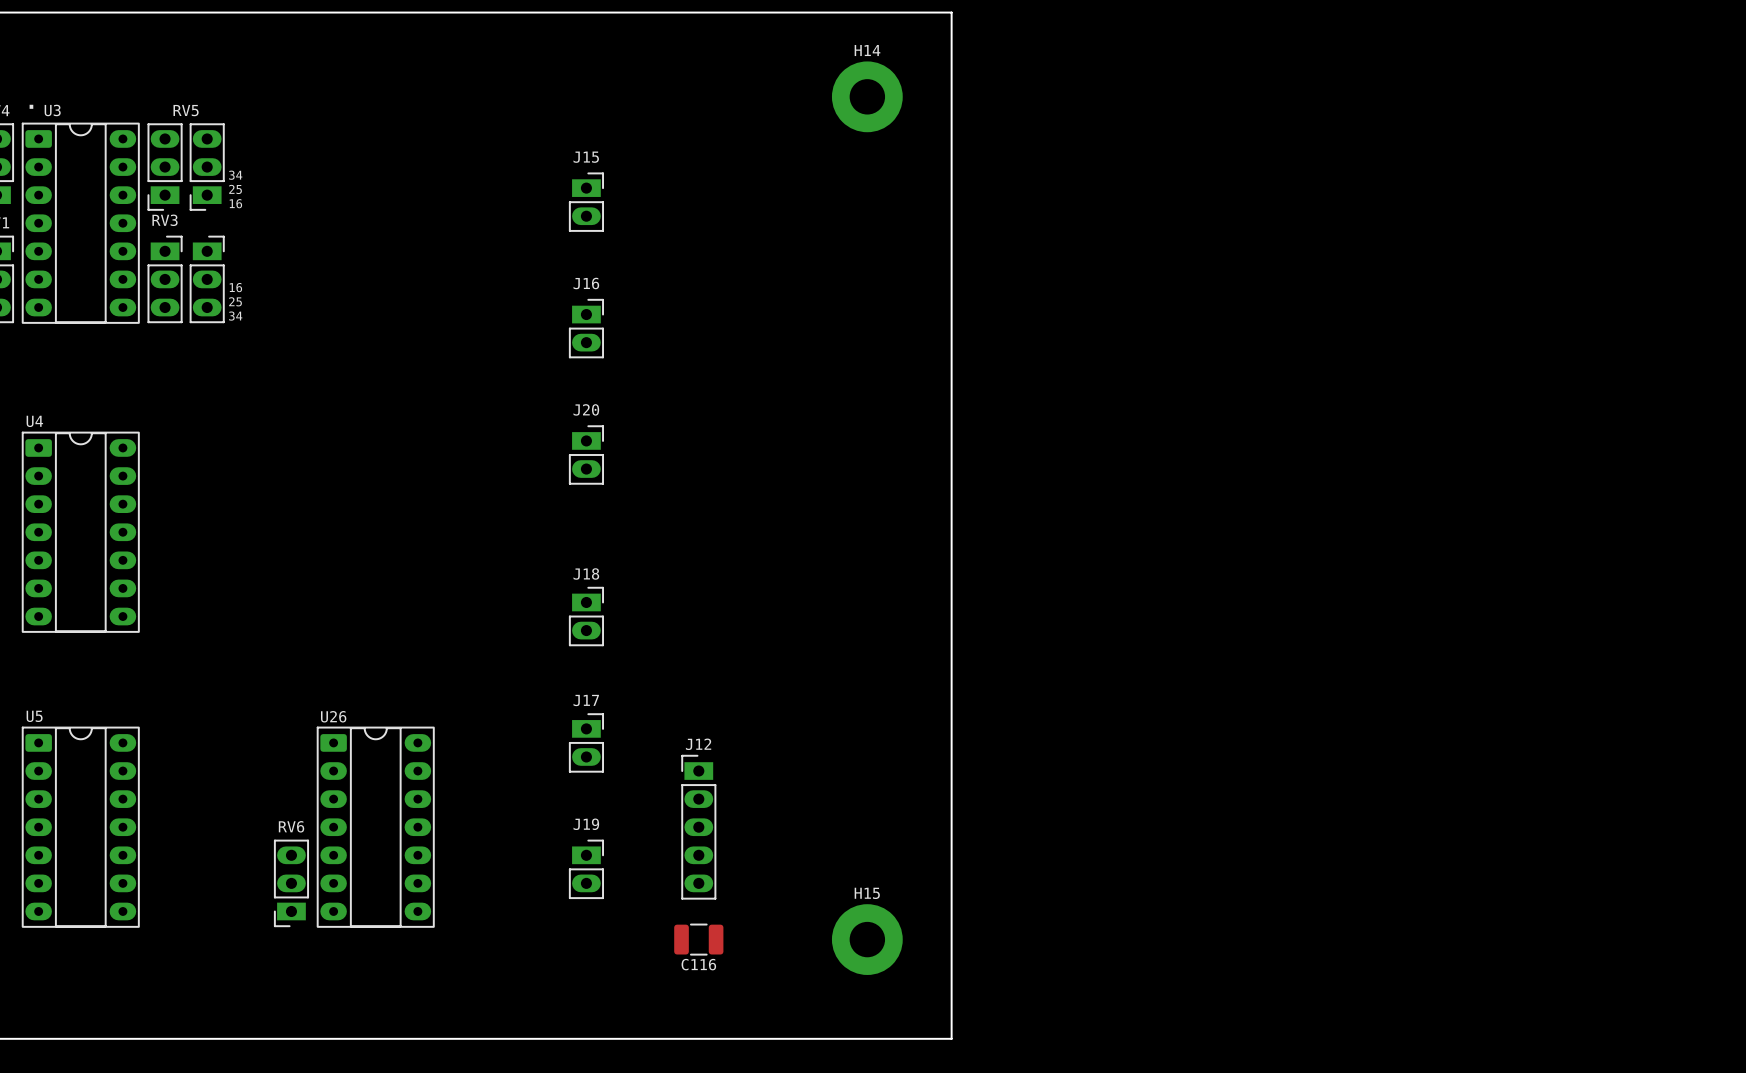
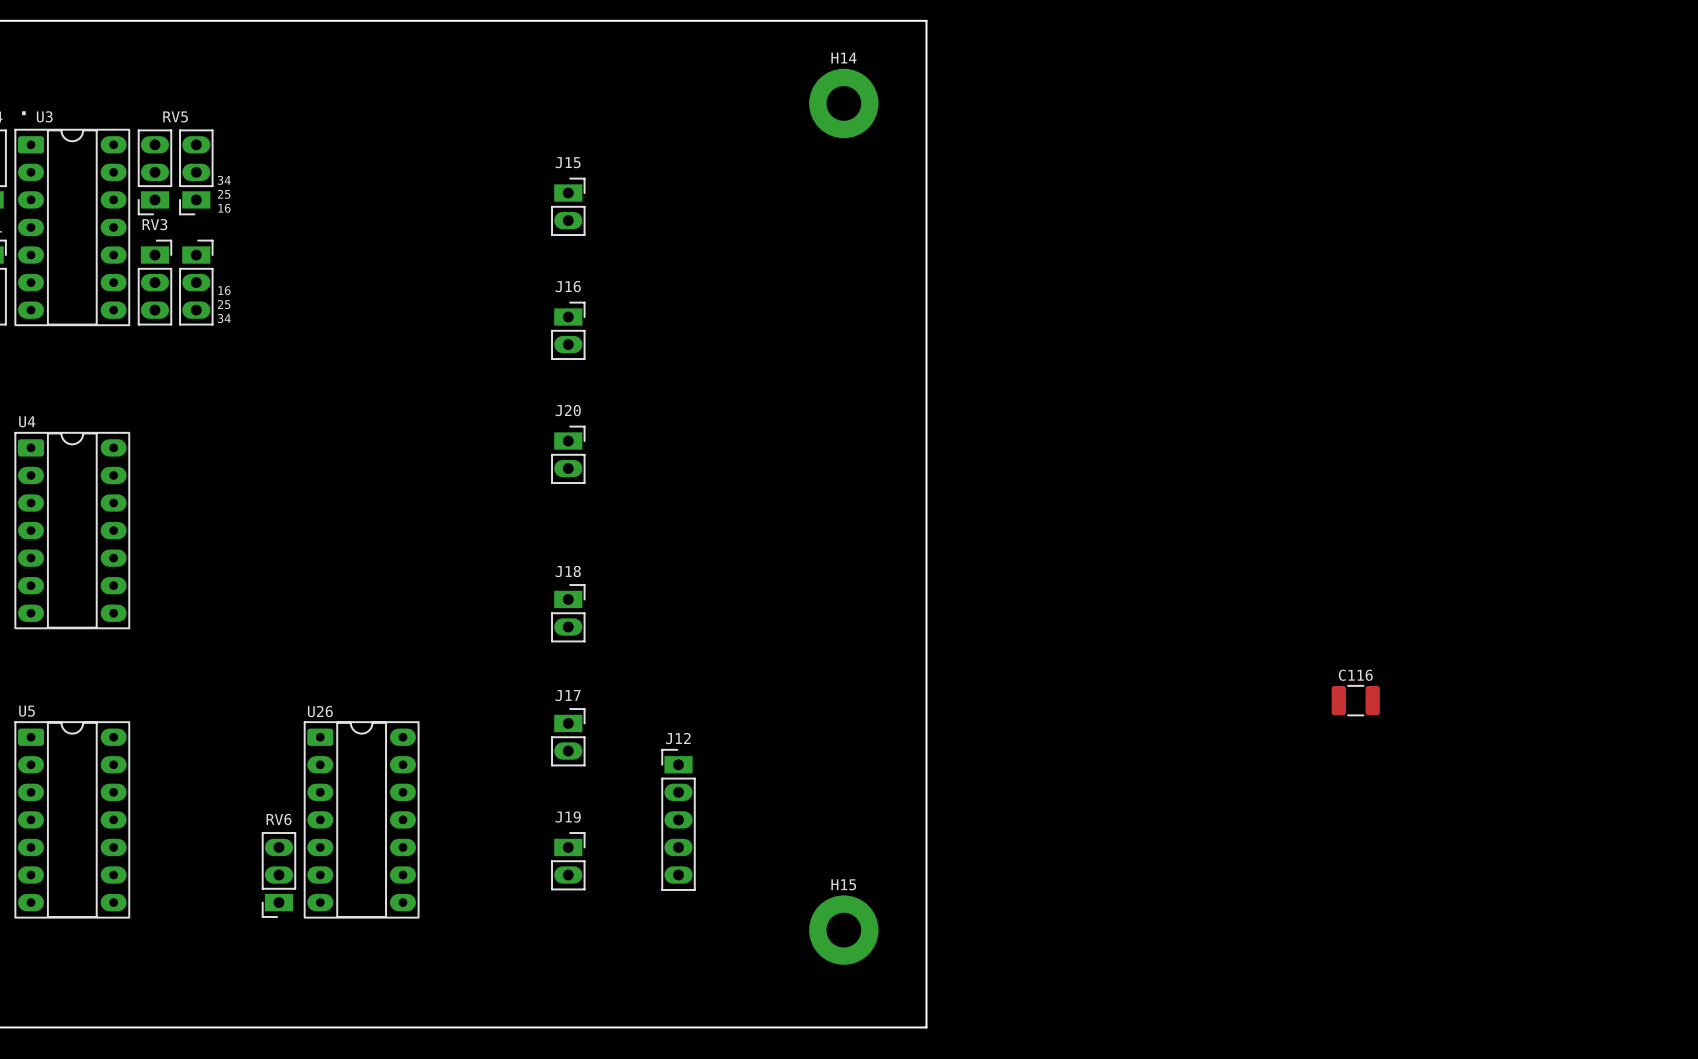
C116 position: (698, 939) -> (1355, 700)
C116 name position: C116 (698, 964) -> C116 (1355, 675)

